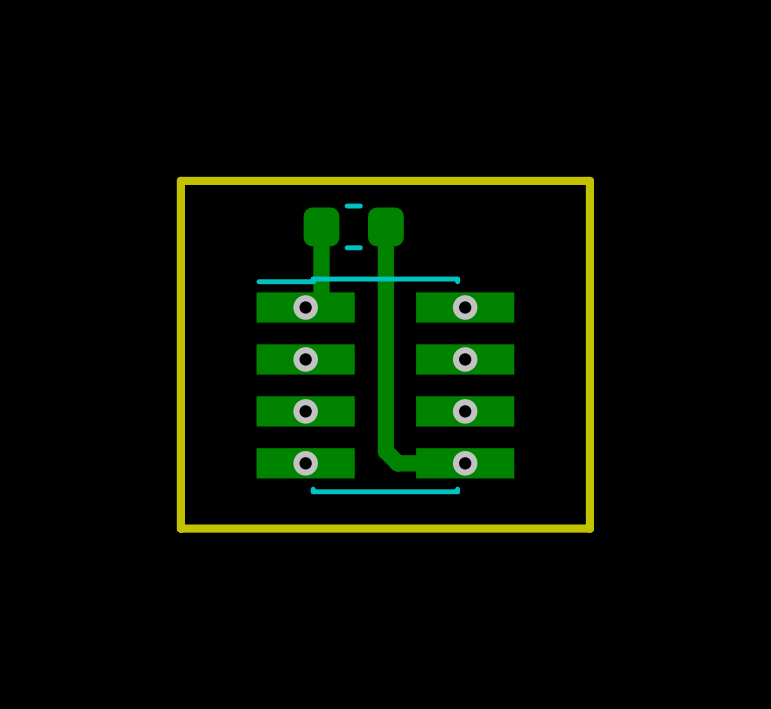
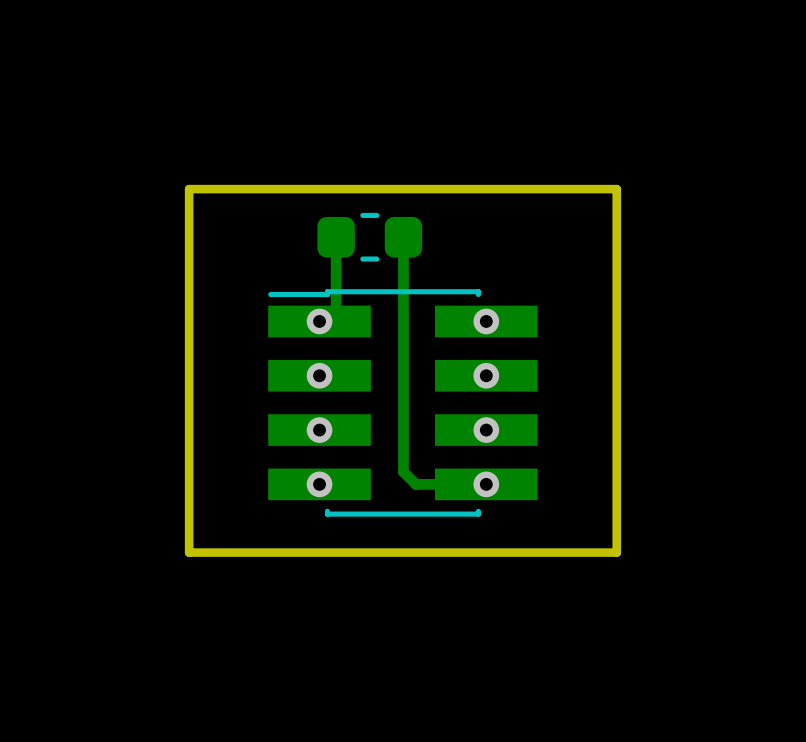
track width: thick (321, 226) (321, 304) (317, 307) (305, 307) -> thin (336, 237) (336, 317) (332, 321) (319, 321)
track width: thick (385, 226) (385, 451) (397, 463) (465, 463) -> thin (403, 237) (403, 471) (415, 484) (486, 484)

